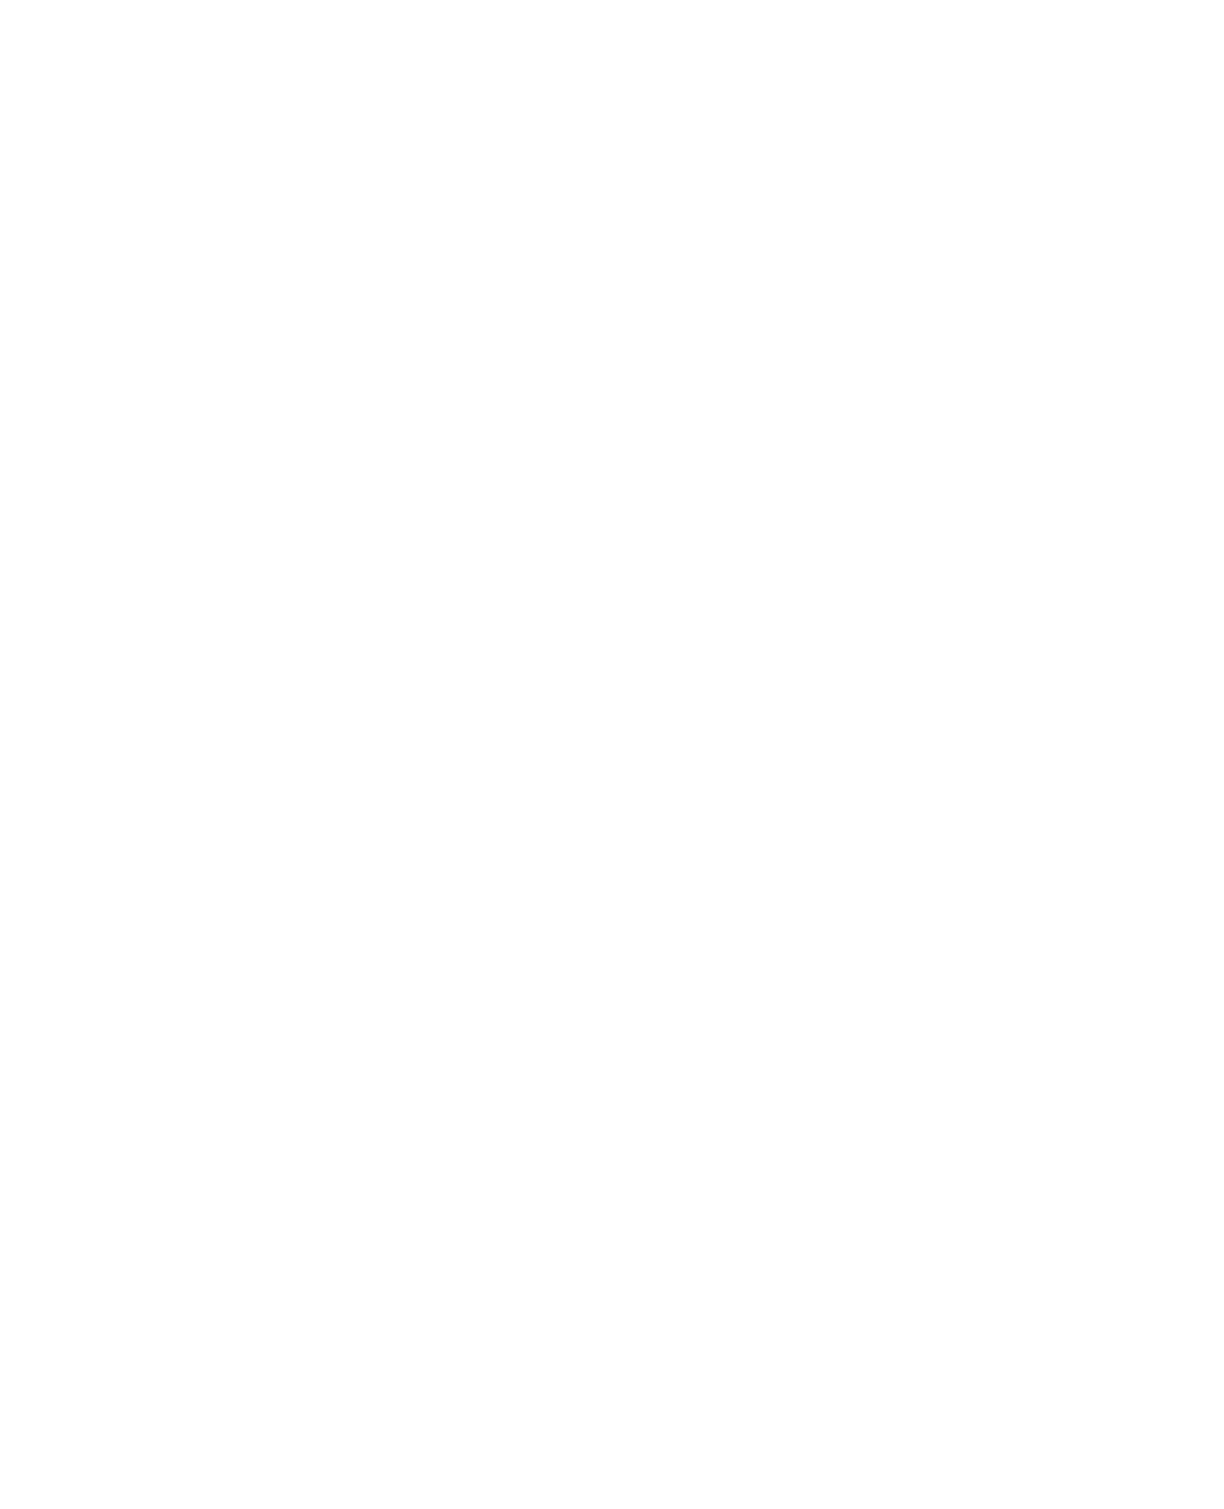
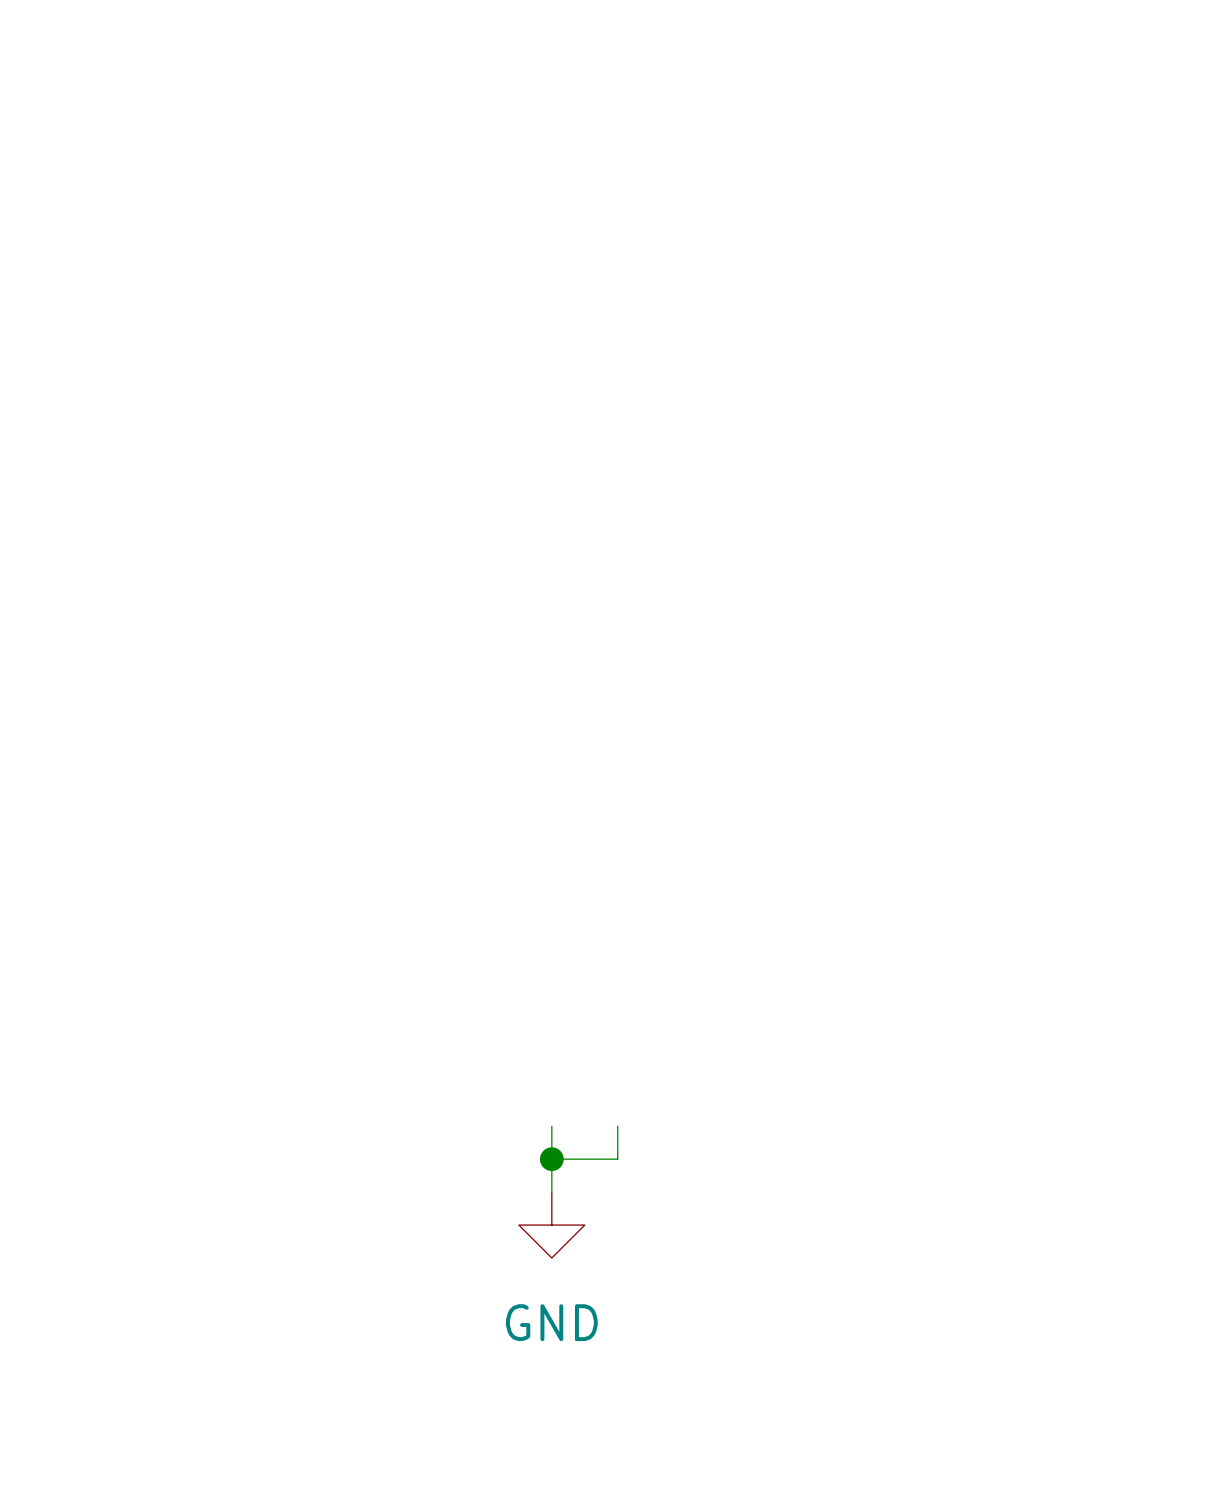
wire: none -> (551, 1126) (551, 1192)
wire: none -> (617, 1126) (617, 1159) (551, 1159)
junction: none -> (551, 1159)
power symbol: none -> GND (551, 1225)

